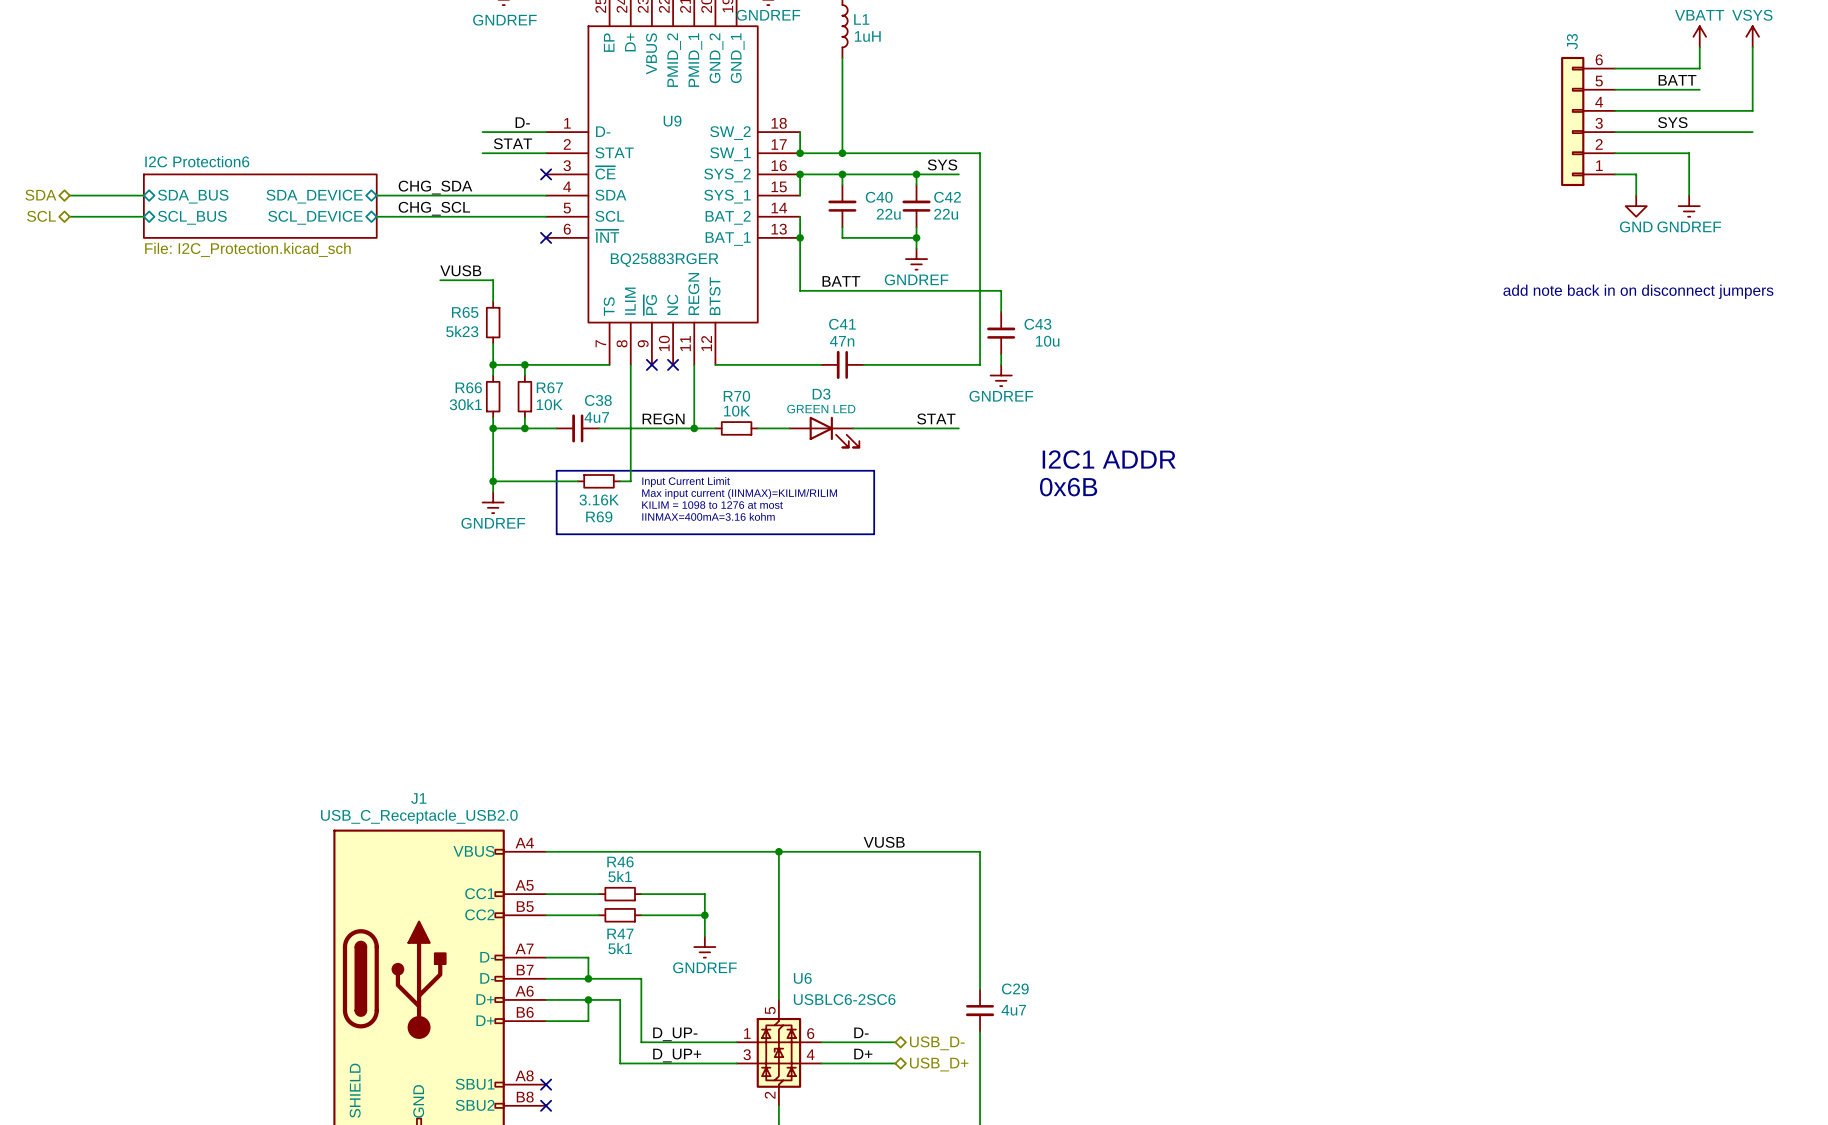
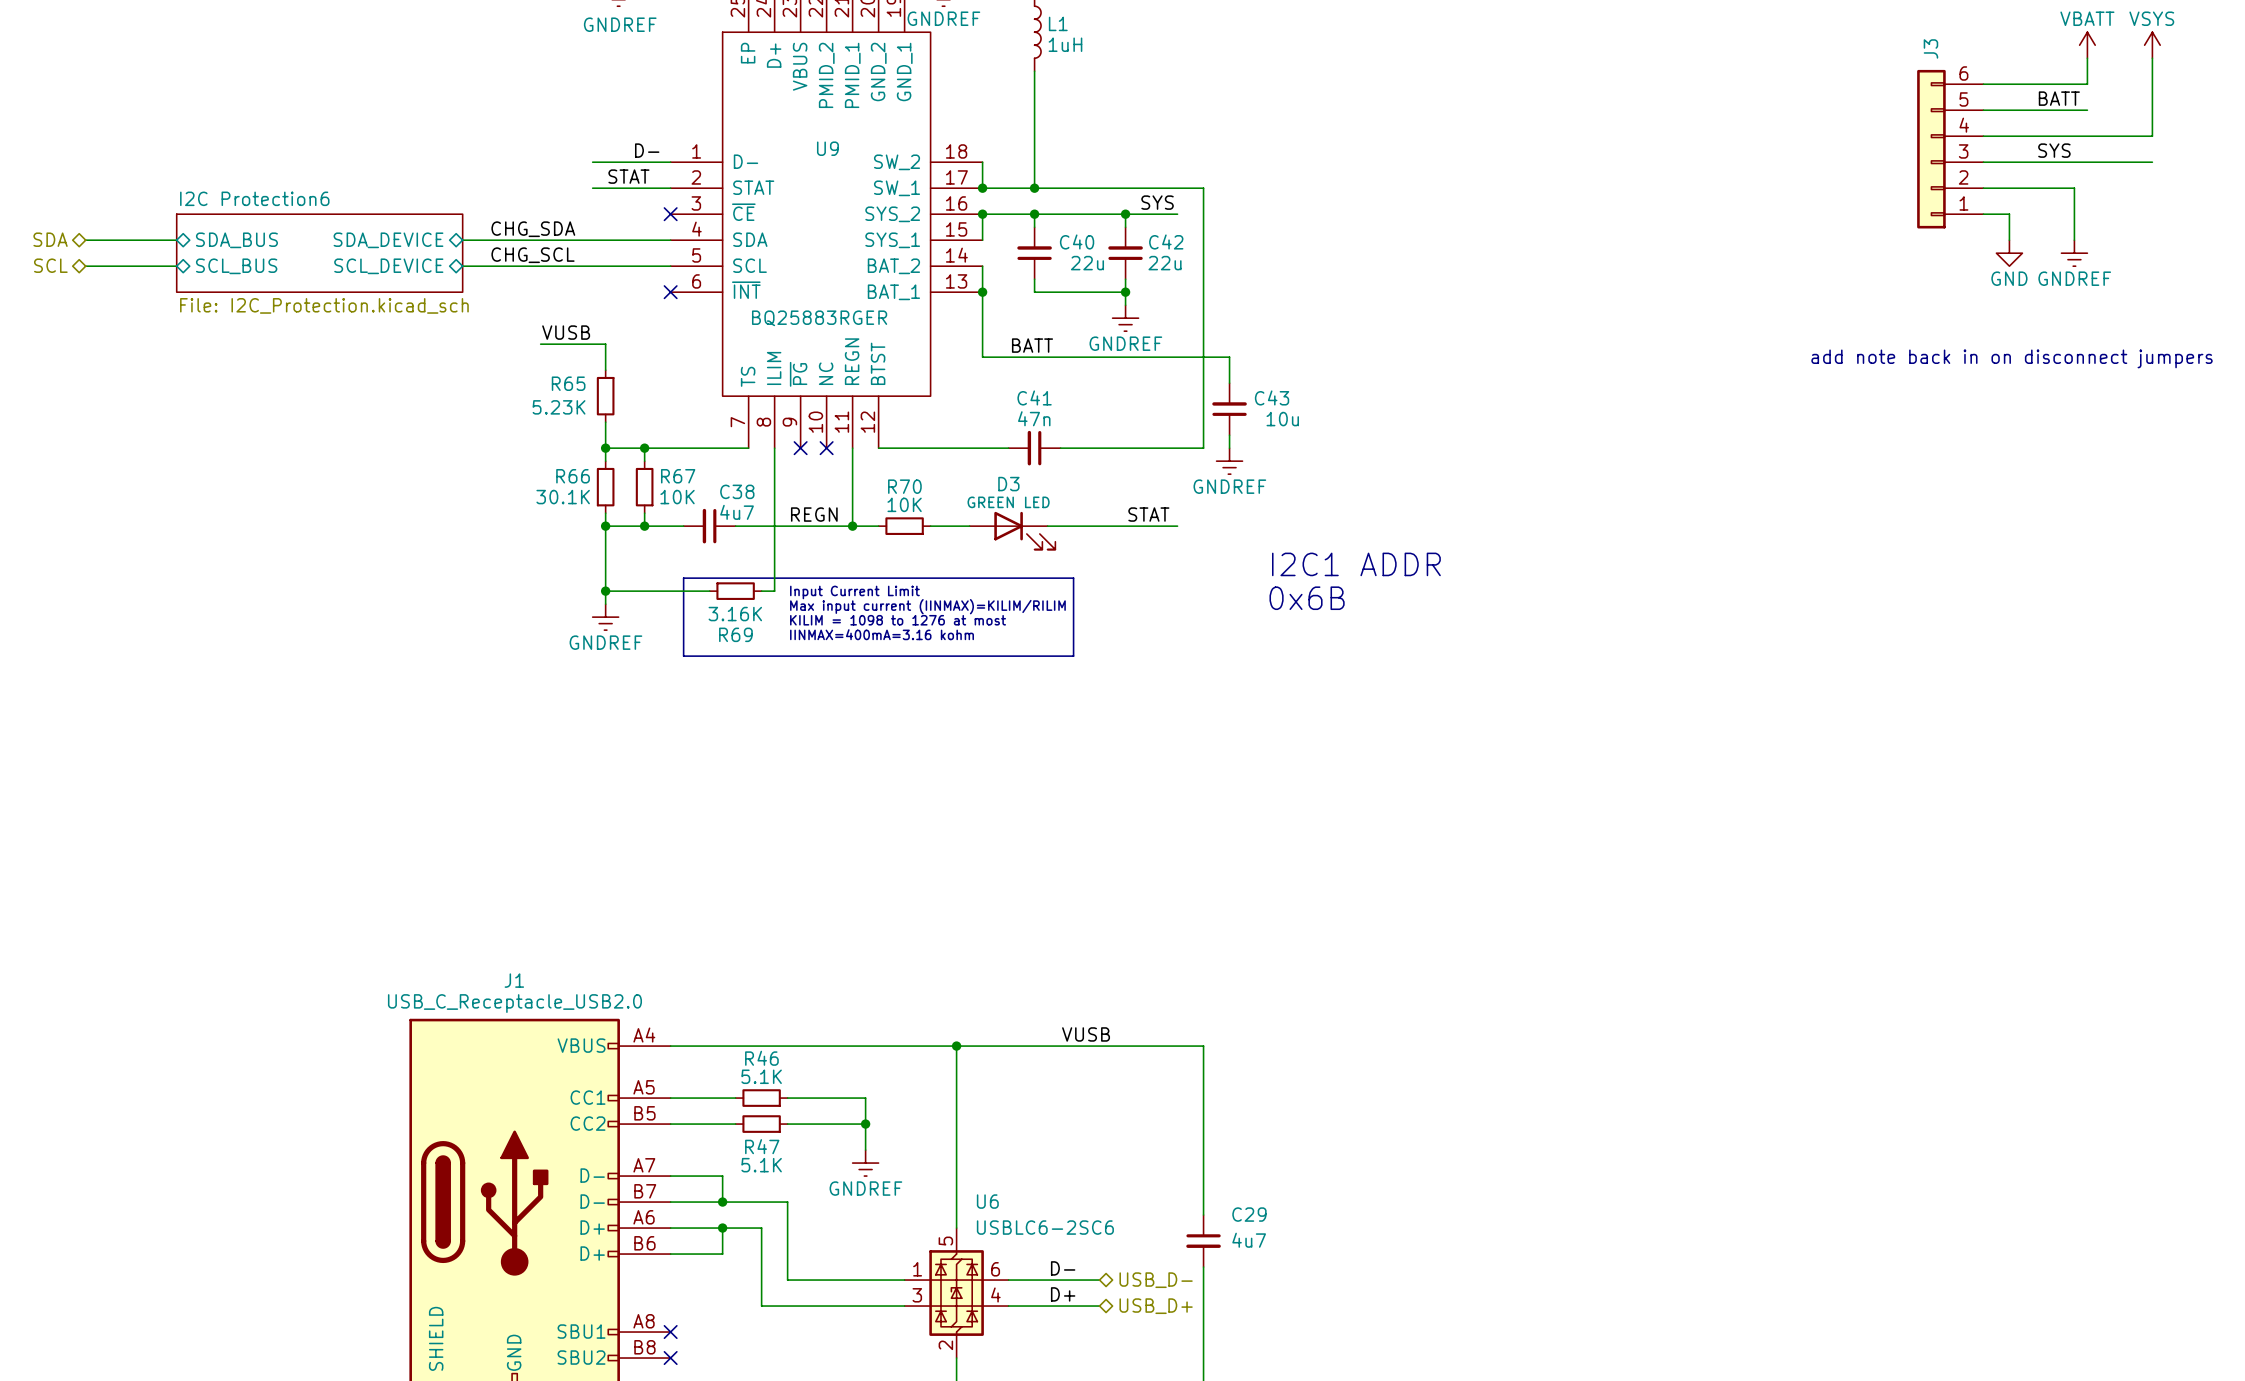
R65 value: 5k23 (462, 331) -> 5.23K (559, 407)
R66 value: 30k1 (465, 404) -> 30.1K (563, 497)
R46 value: 5k1 (620, 876) -> 5.1K (761, 1076)
R47 value: 5k1 (620, 948) -> 5.1K (761, 1165)
label: D_UP- (675, 1034) -> none
label: D_UP+ (677, 1055) -> none

